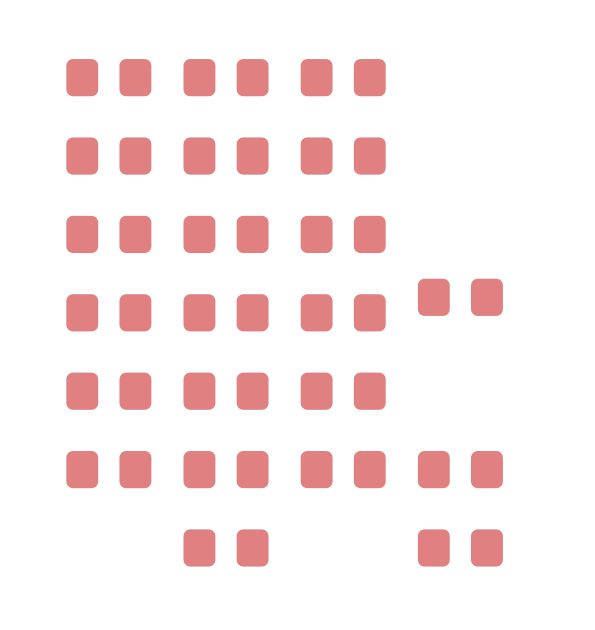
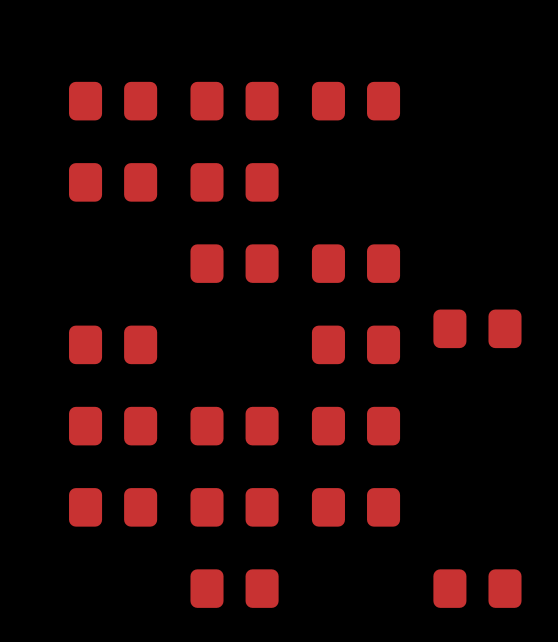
part: (343, 156) -> none
part: (108, 234) -> none
part: (226, 312) -> none
part: (460, 469) -> none

